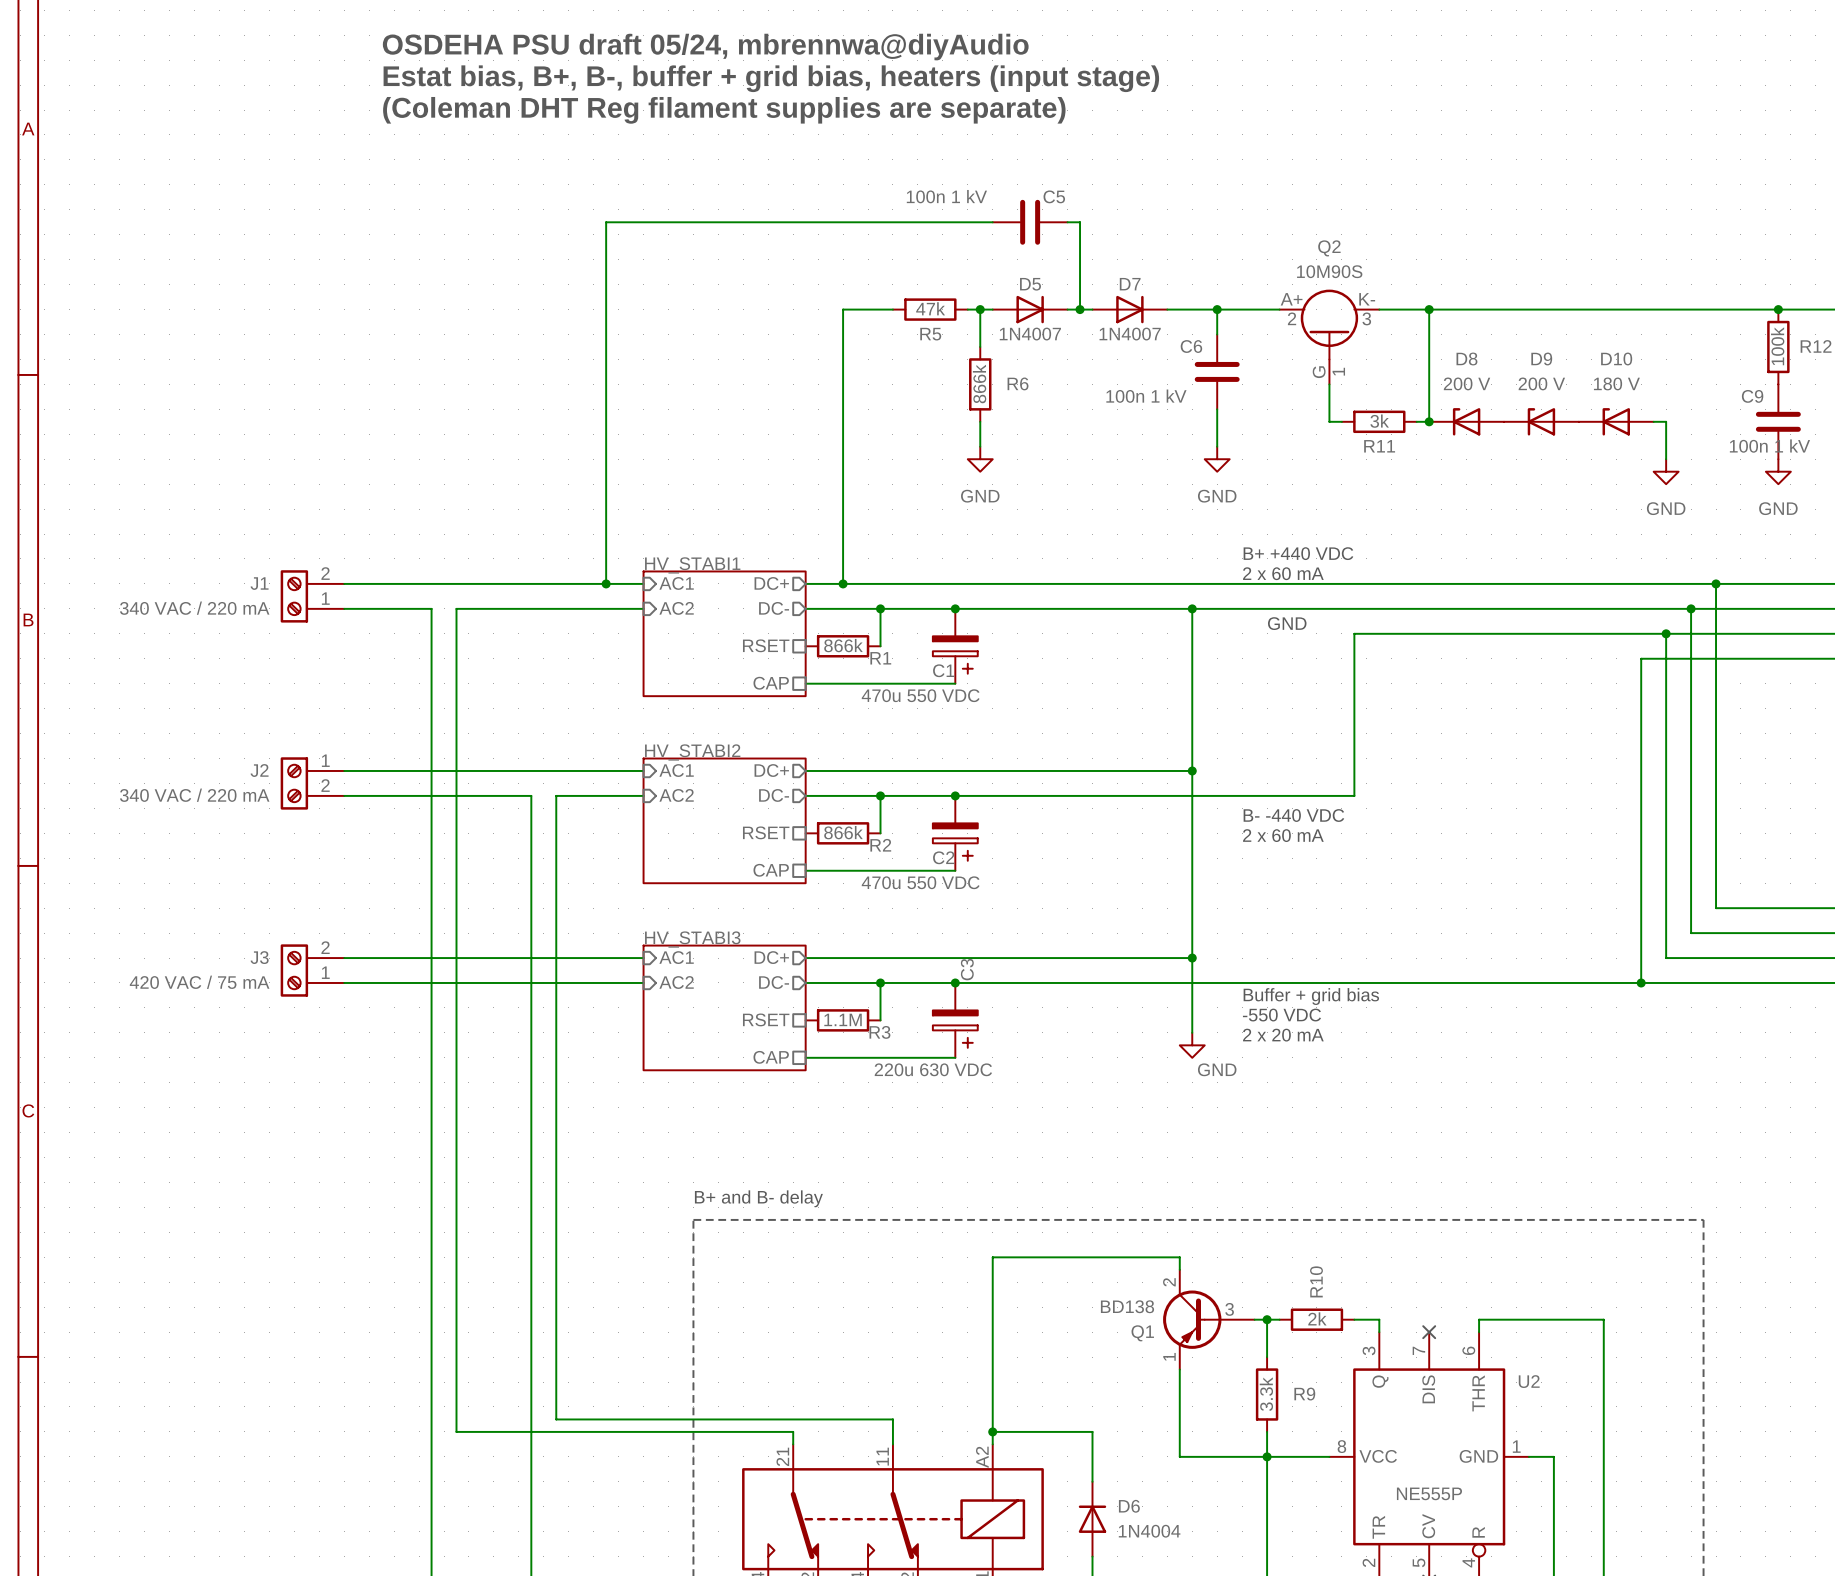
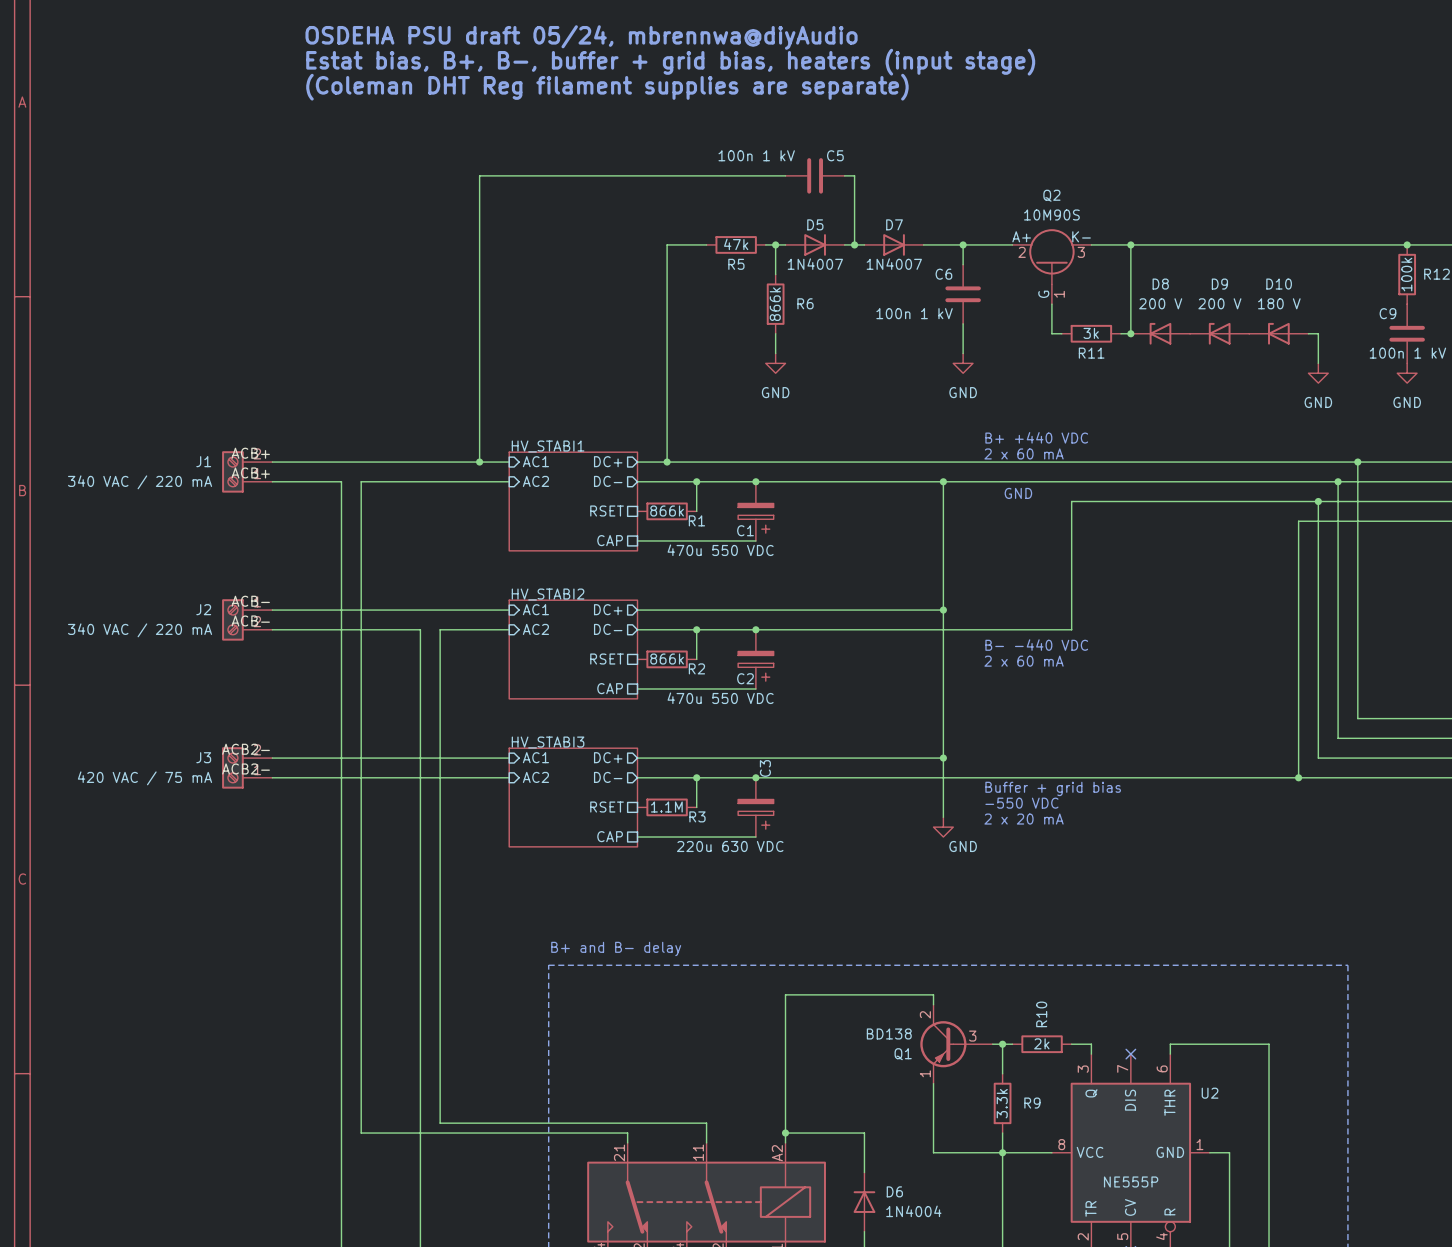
label: none -> ACB+ (250, 453)
label: none -> ACB+ (250, 472)
label: none -> ACB- (250, 601)
label: none -> ACB- (250, 620)
label: none -> ACB2- (246, 749)
label: none -> ACB2- (246, 768)

